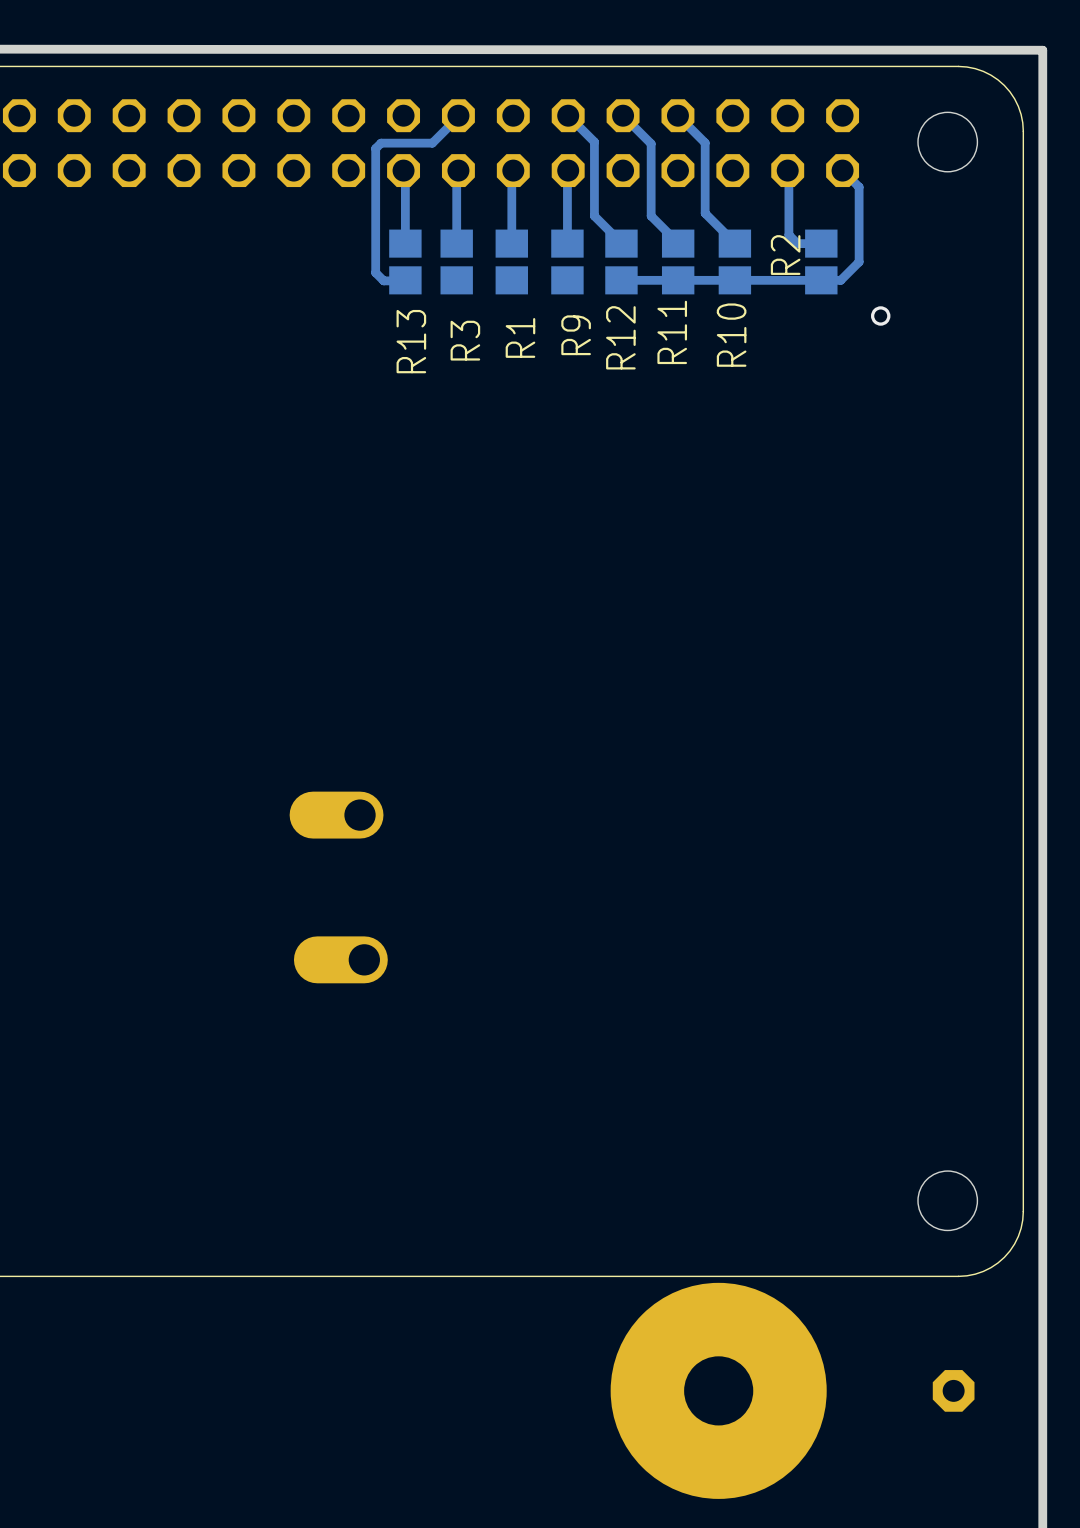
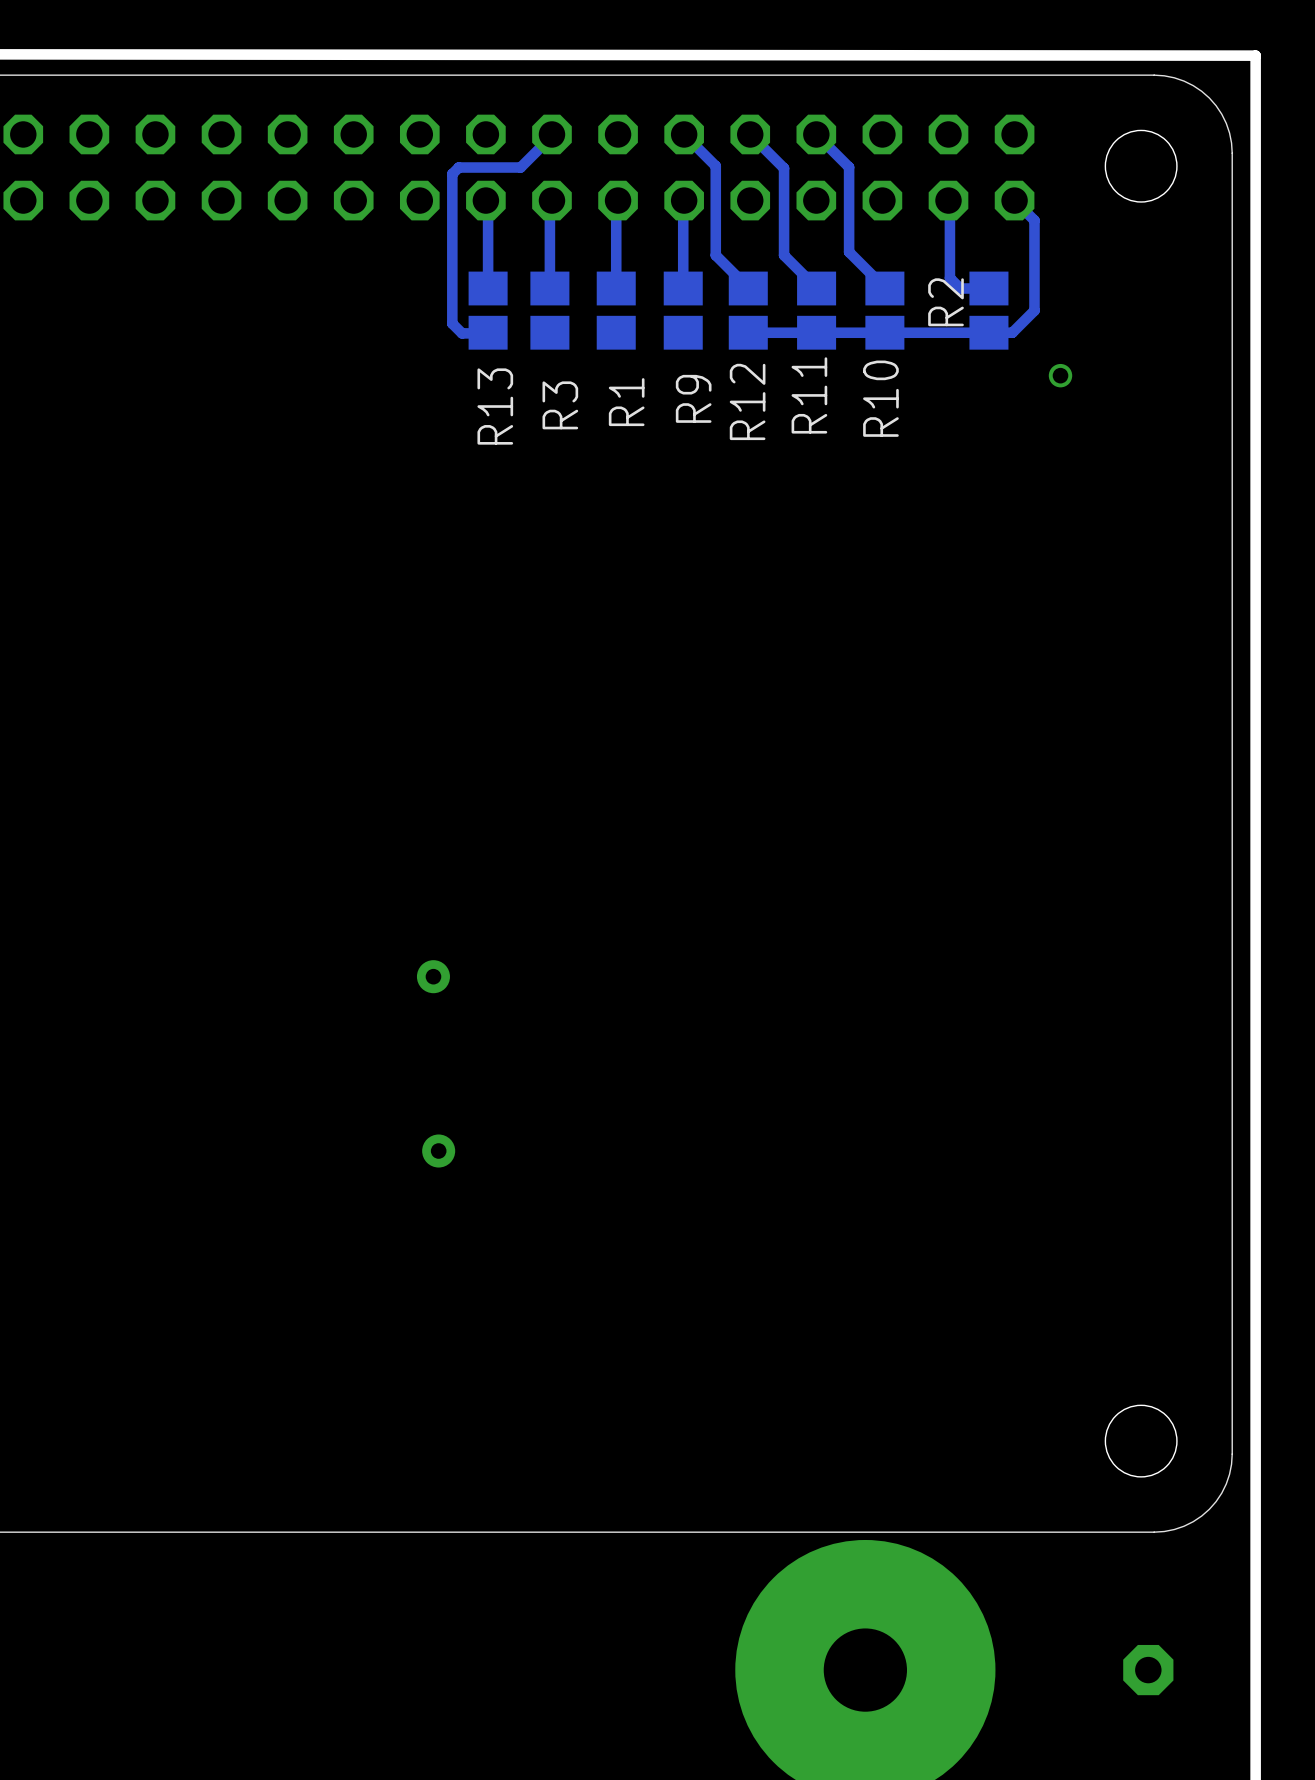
part: (336, 815) -> none
part: none -> (433, 976)
part: (340, 959) -> none
part: none -> (438, 1151)

